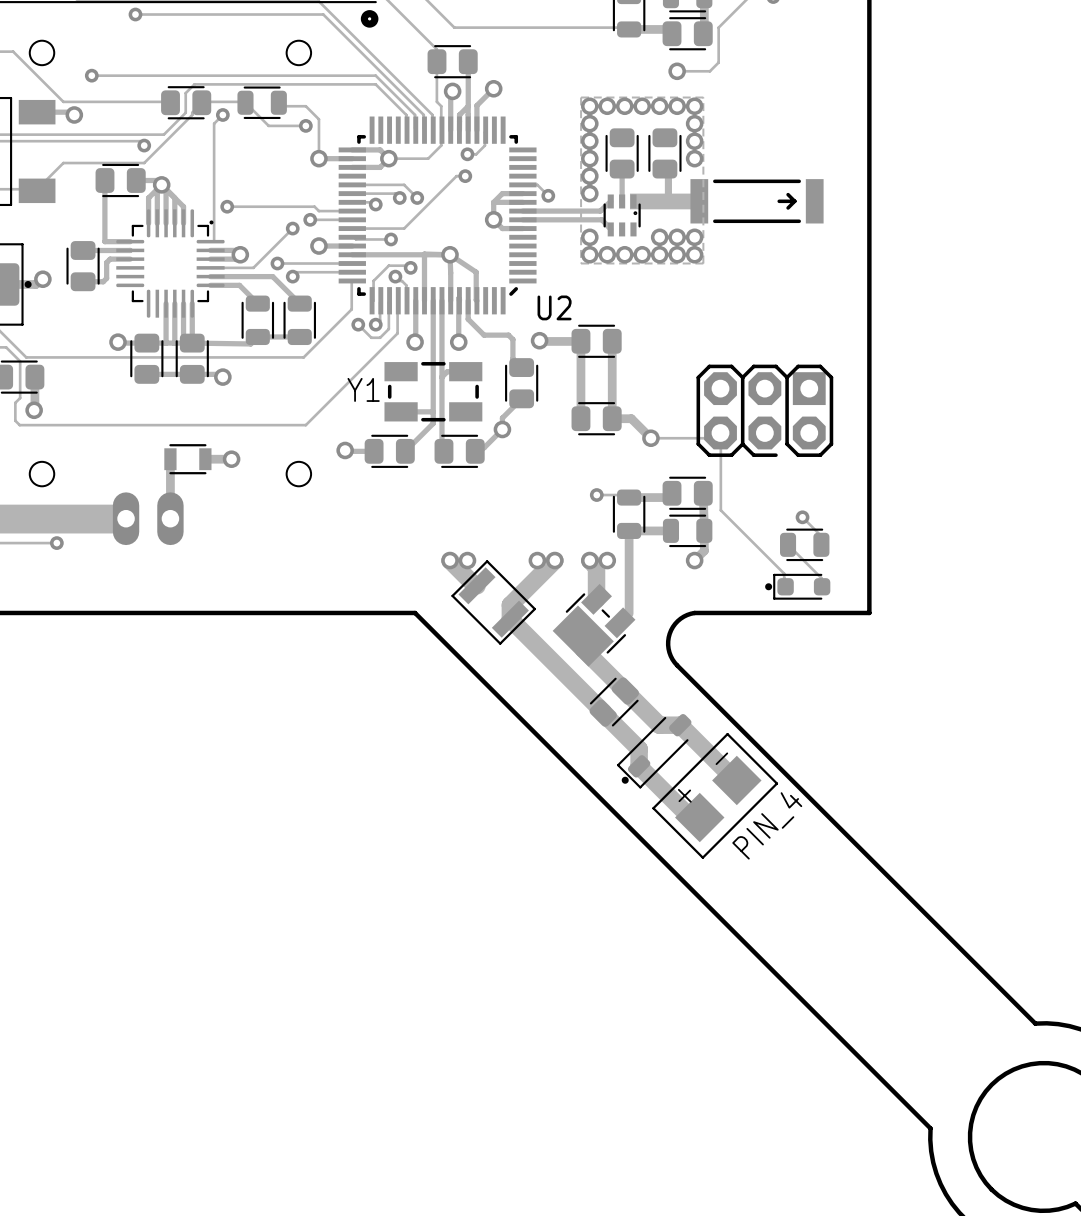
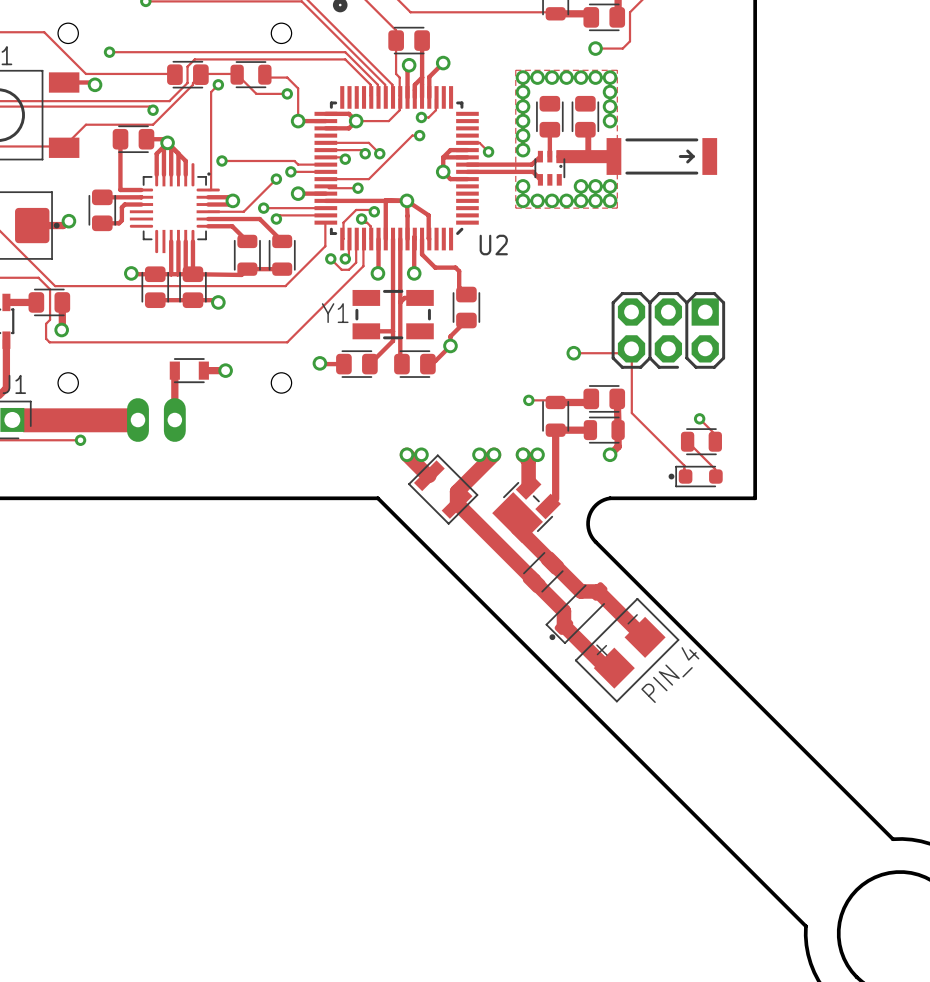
track: (539, 340) (578, 341) -> none
via: (539, 340) -> none
track: (578, 341) (580, 341) (580, 418) -> none
part: (596, 341) -> none
track: (612, 341) (612, 418) (631, 418) (650, 438) -> none
part: (596, 418) -> none

